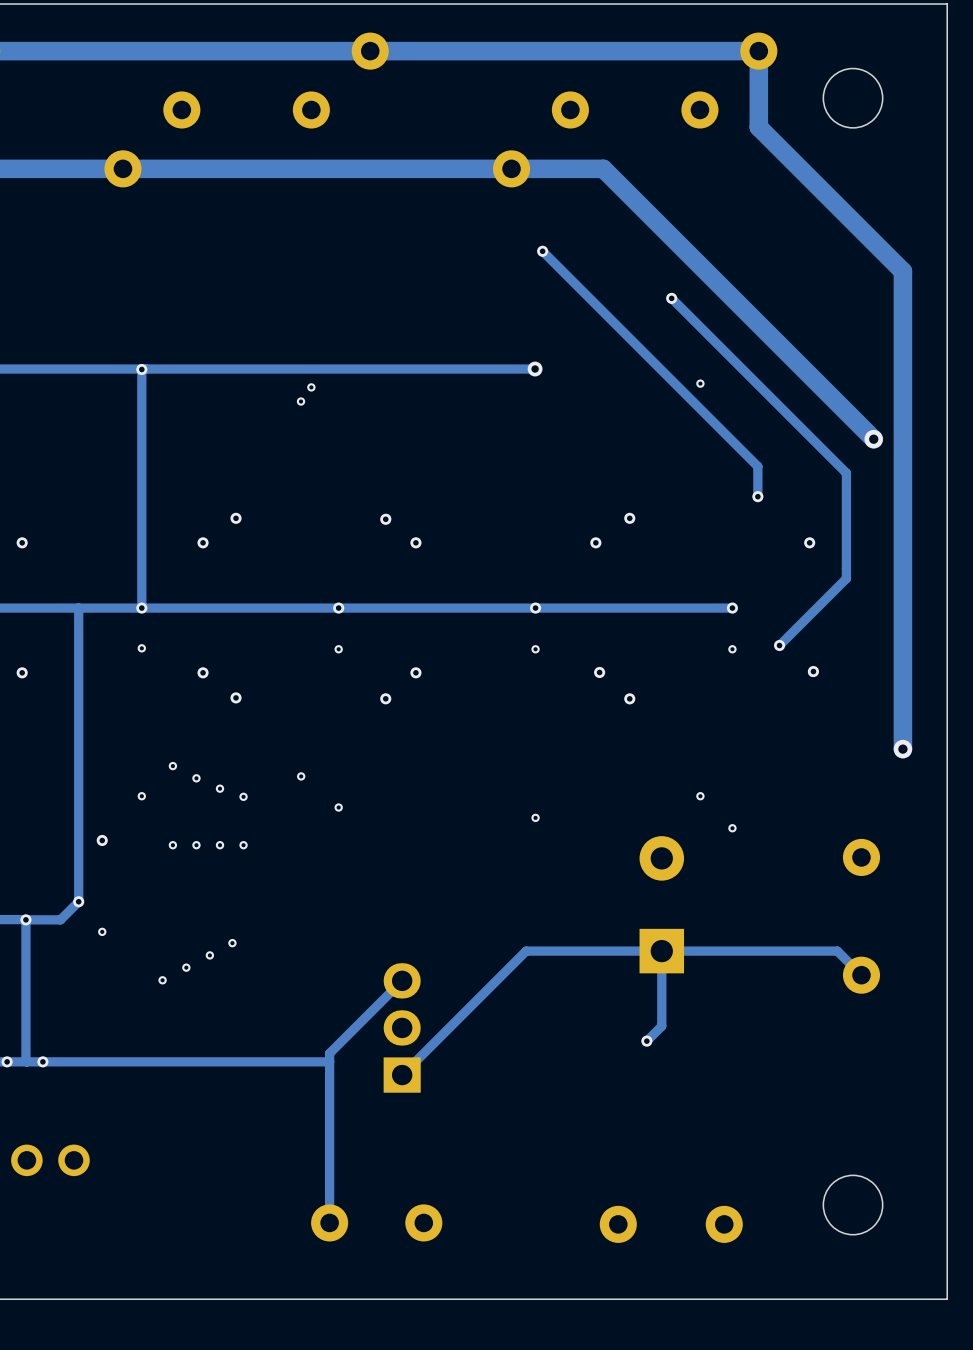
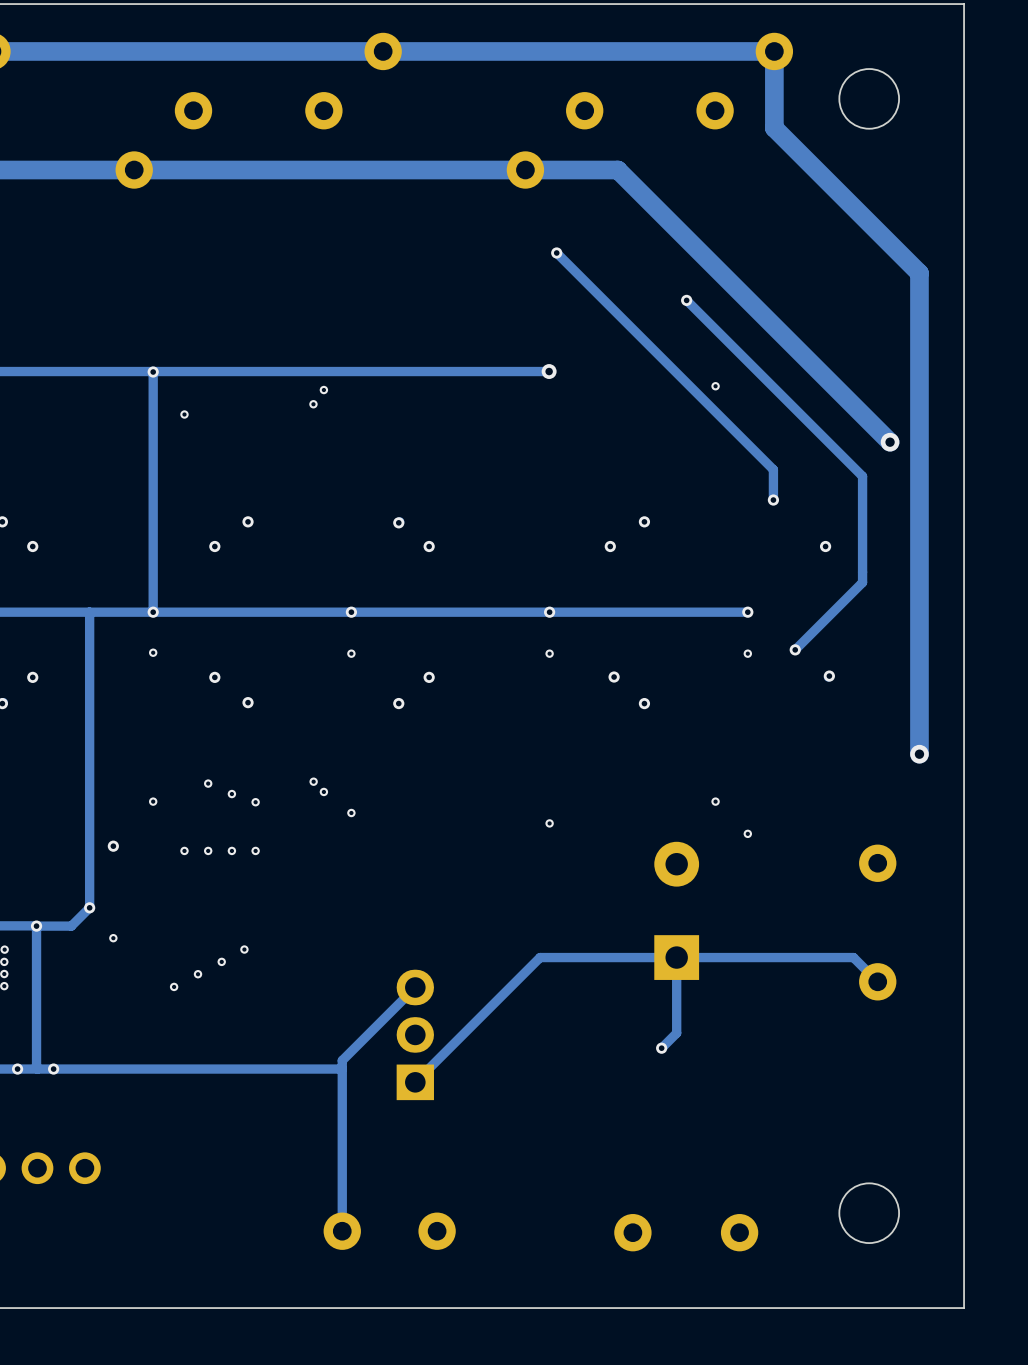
via: none -> (184, 414)
via: (172, 766) -> none
via: none -> (323, 791)

